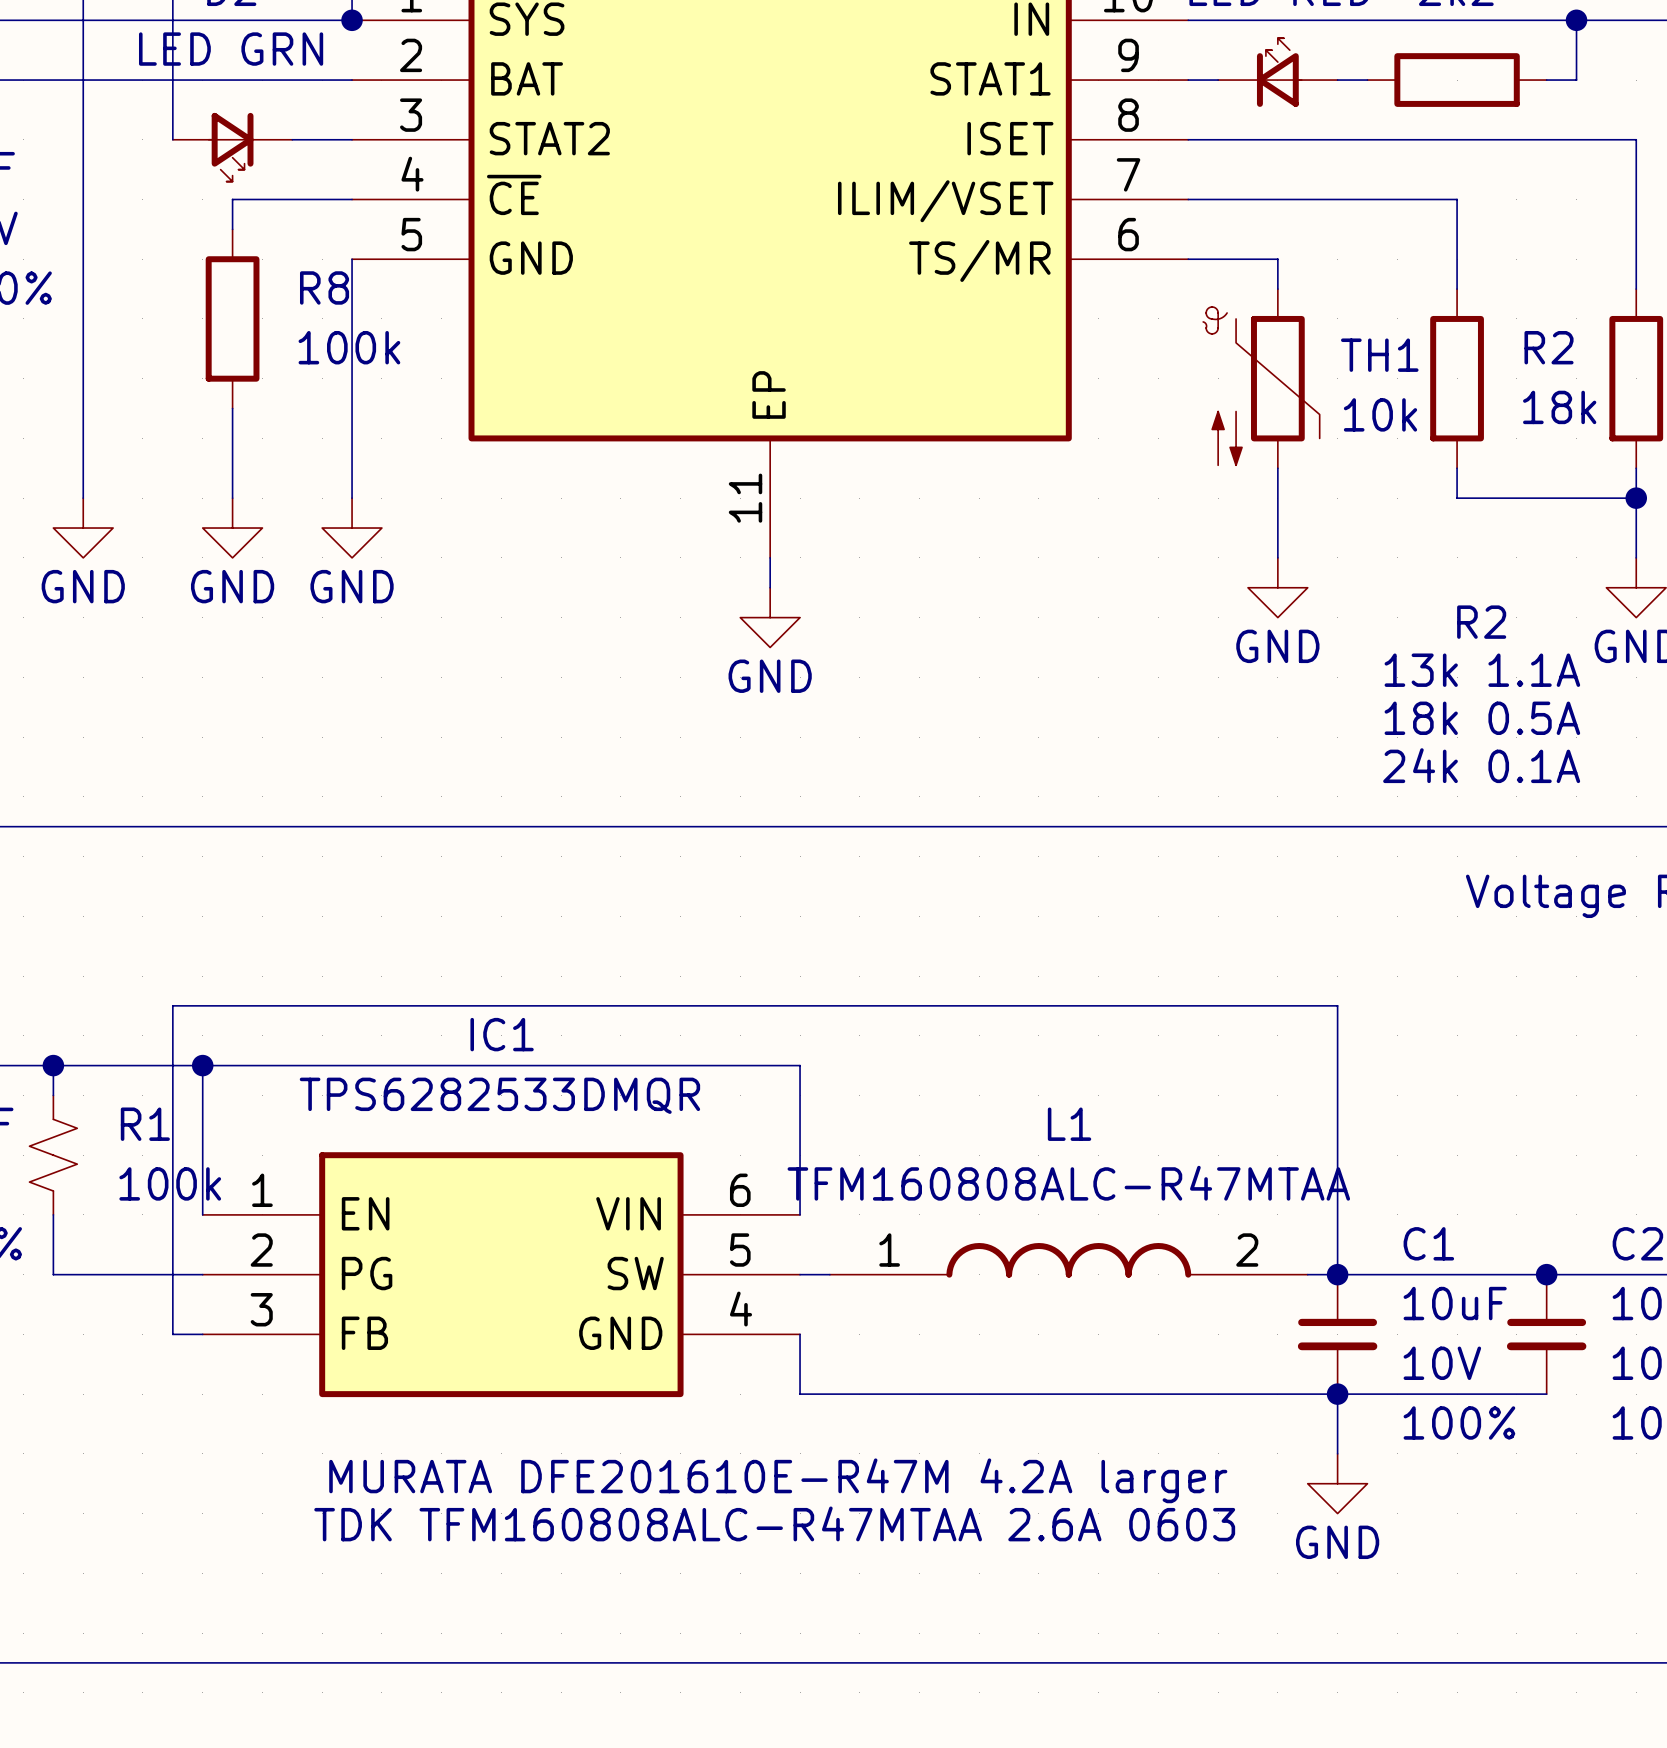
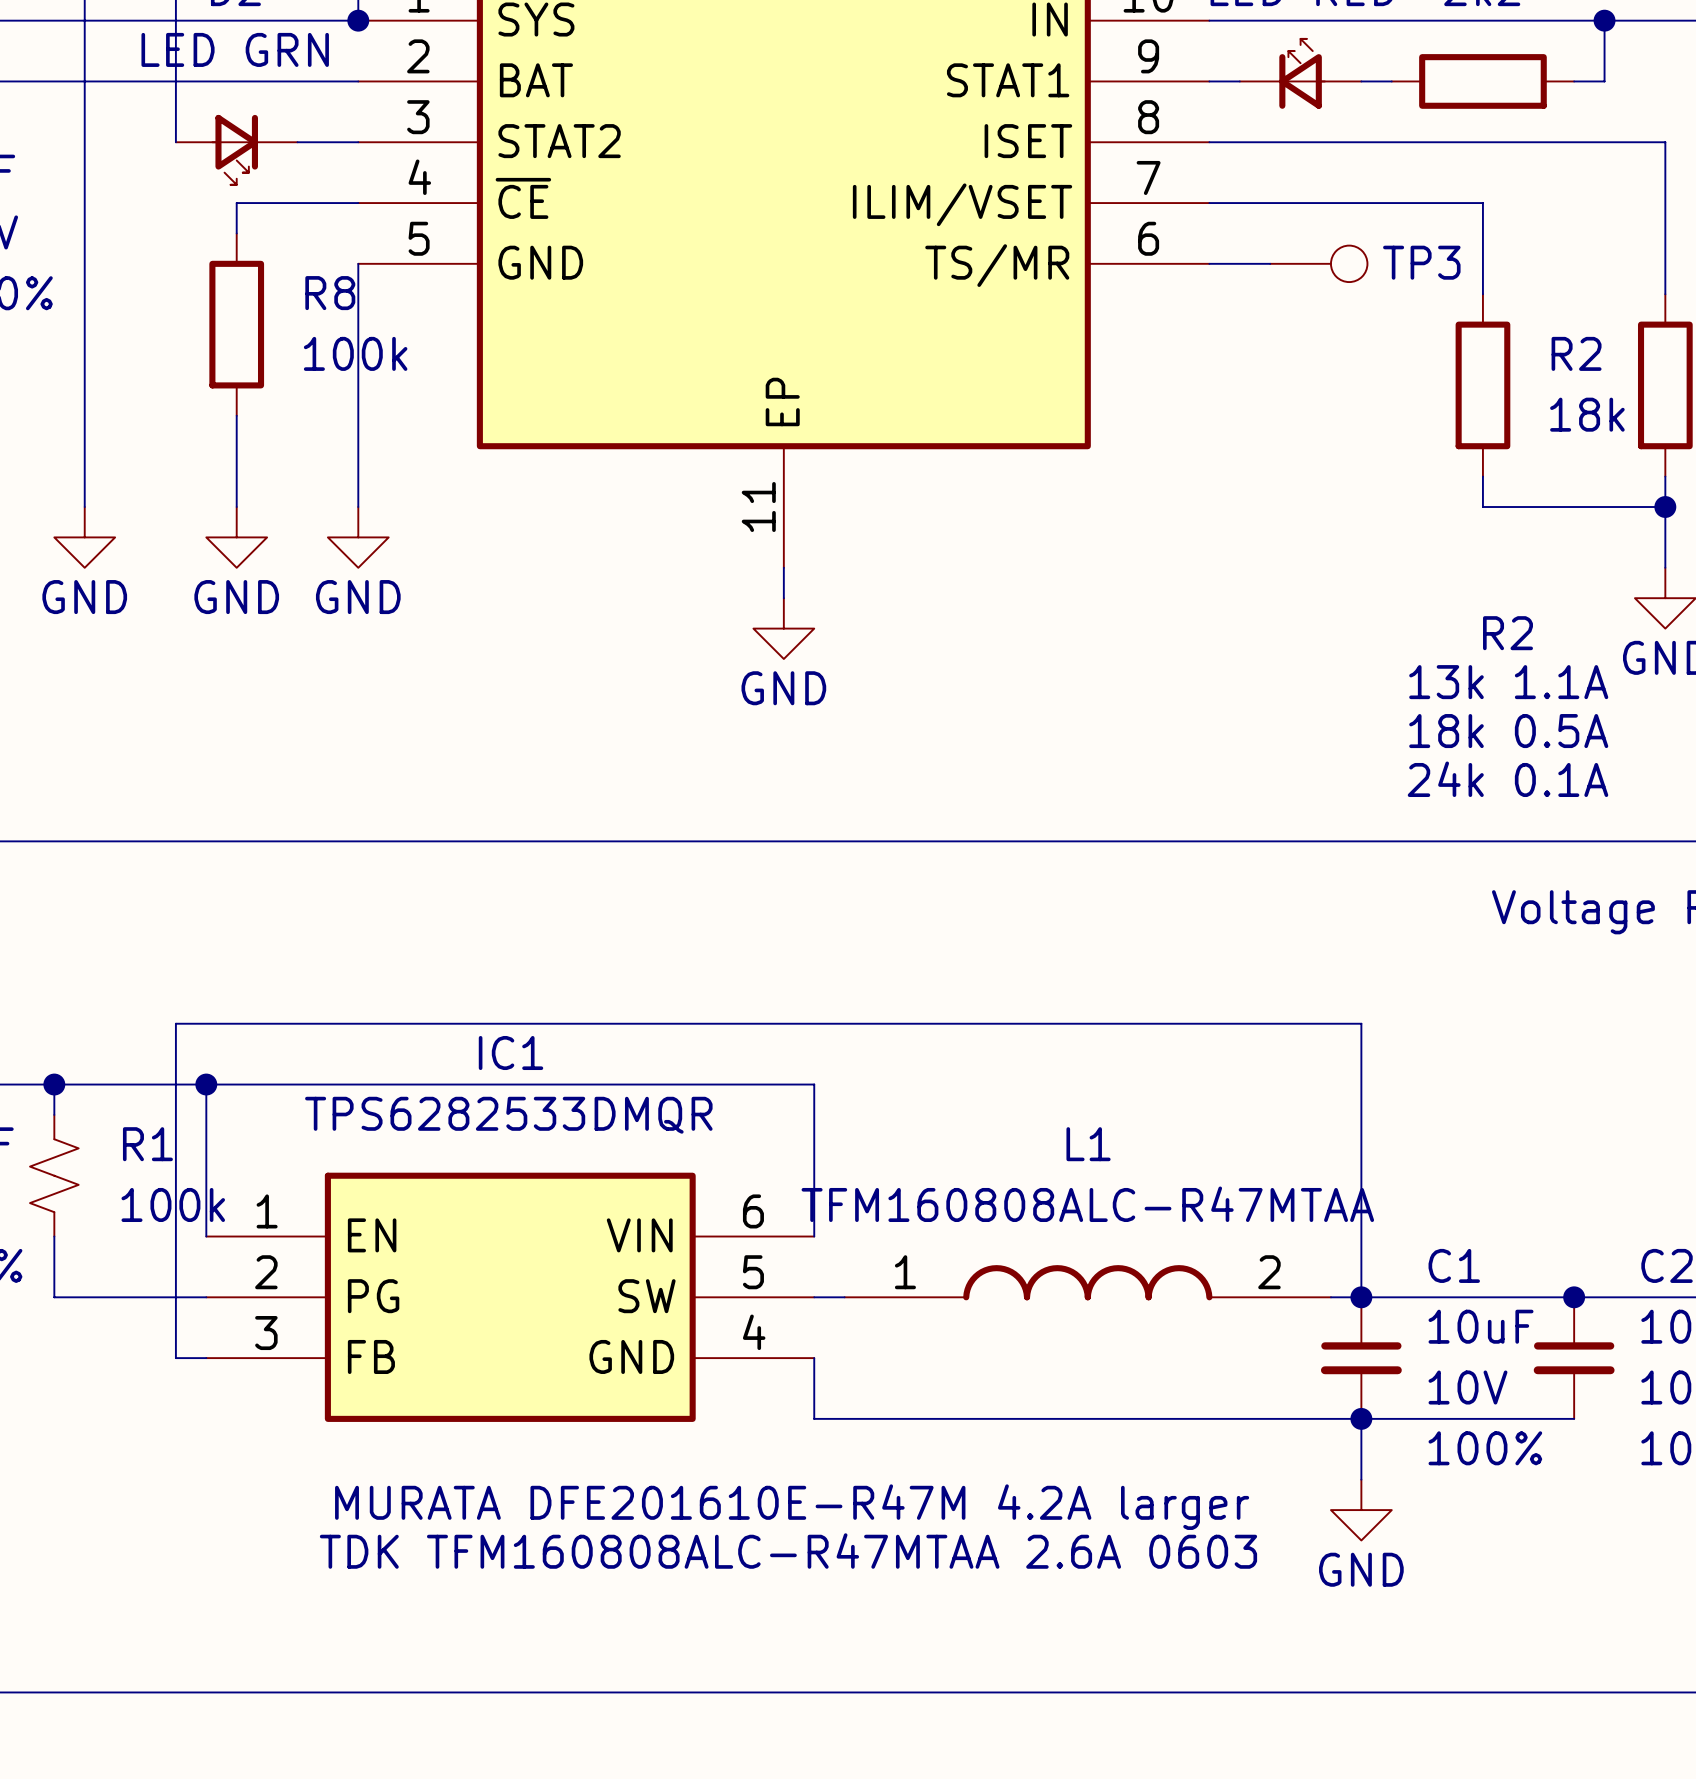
wire: (1248, 259) (1277, 259) (1277, 289) -> none
TP3: none -> (1318, 263)
TH1: 10k (1261, 378) -> none
wire: (1277, 468) (1277, 557) -> none
power symbol: GND (1277, 587) -> none

